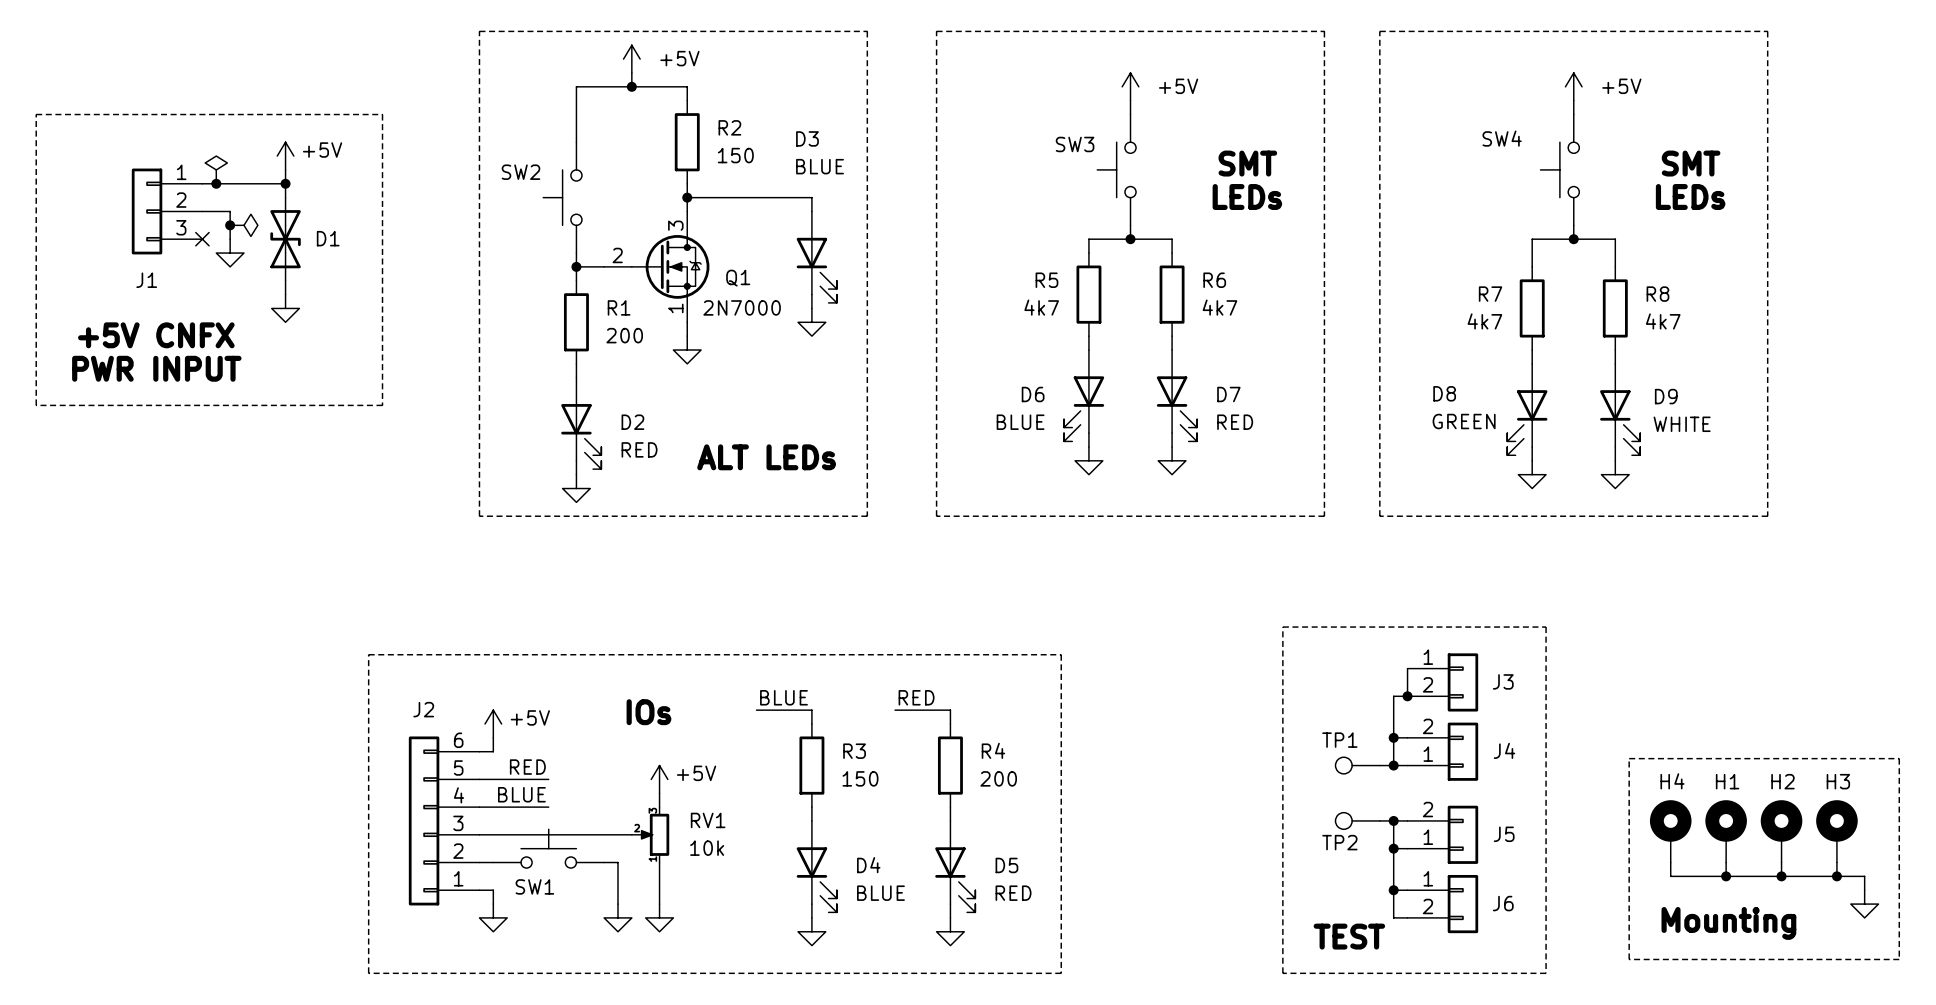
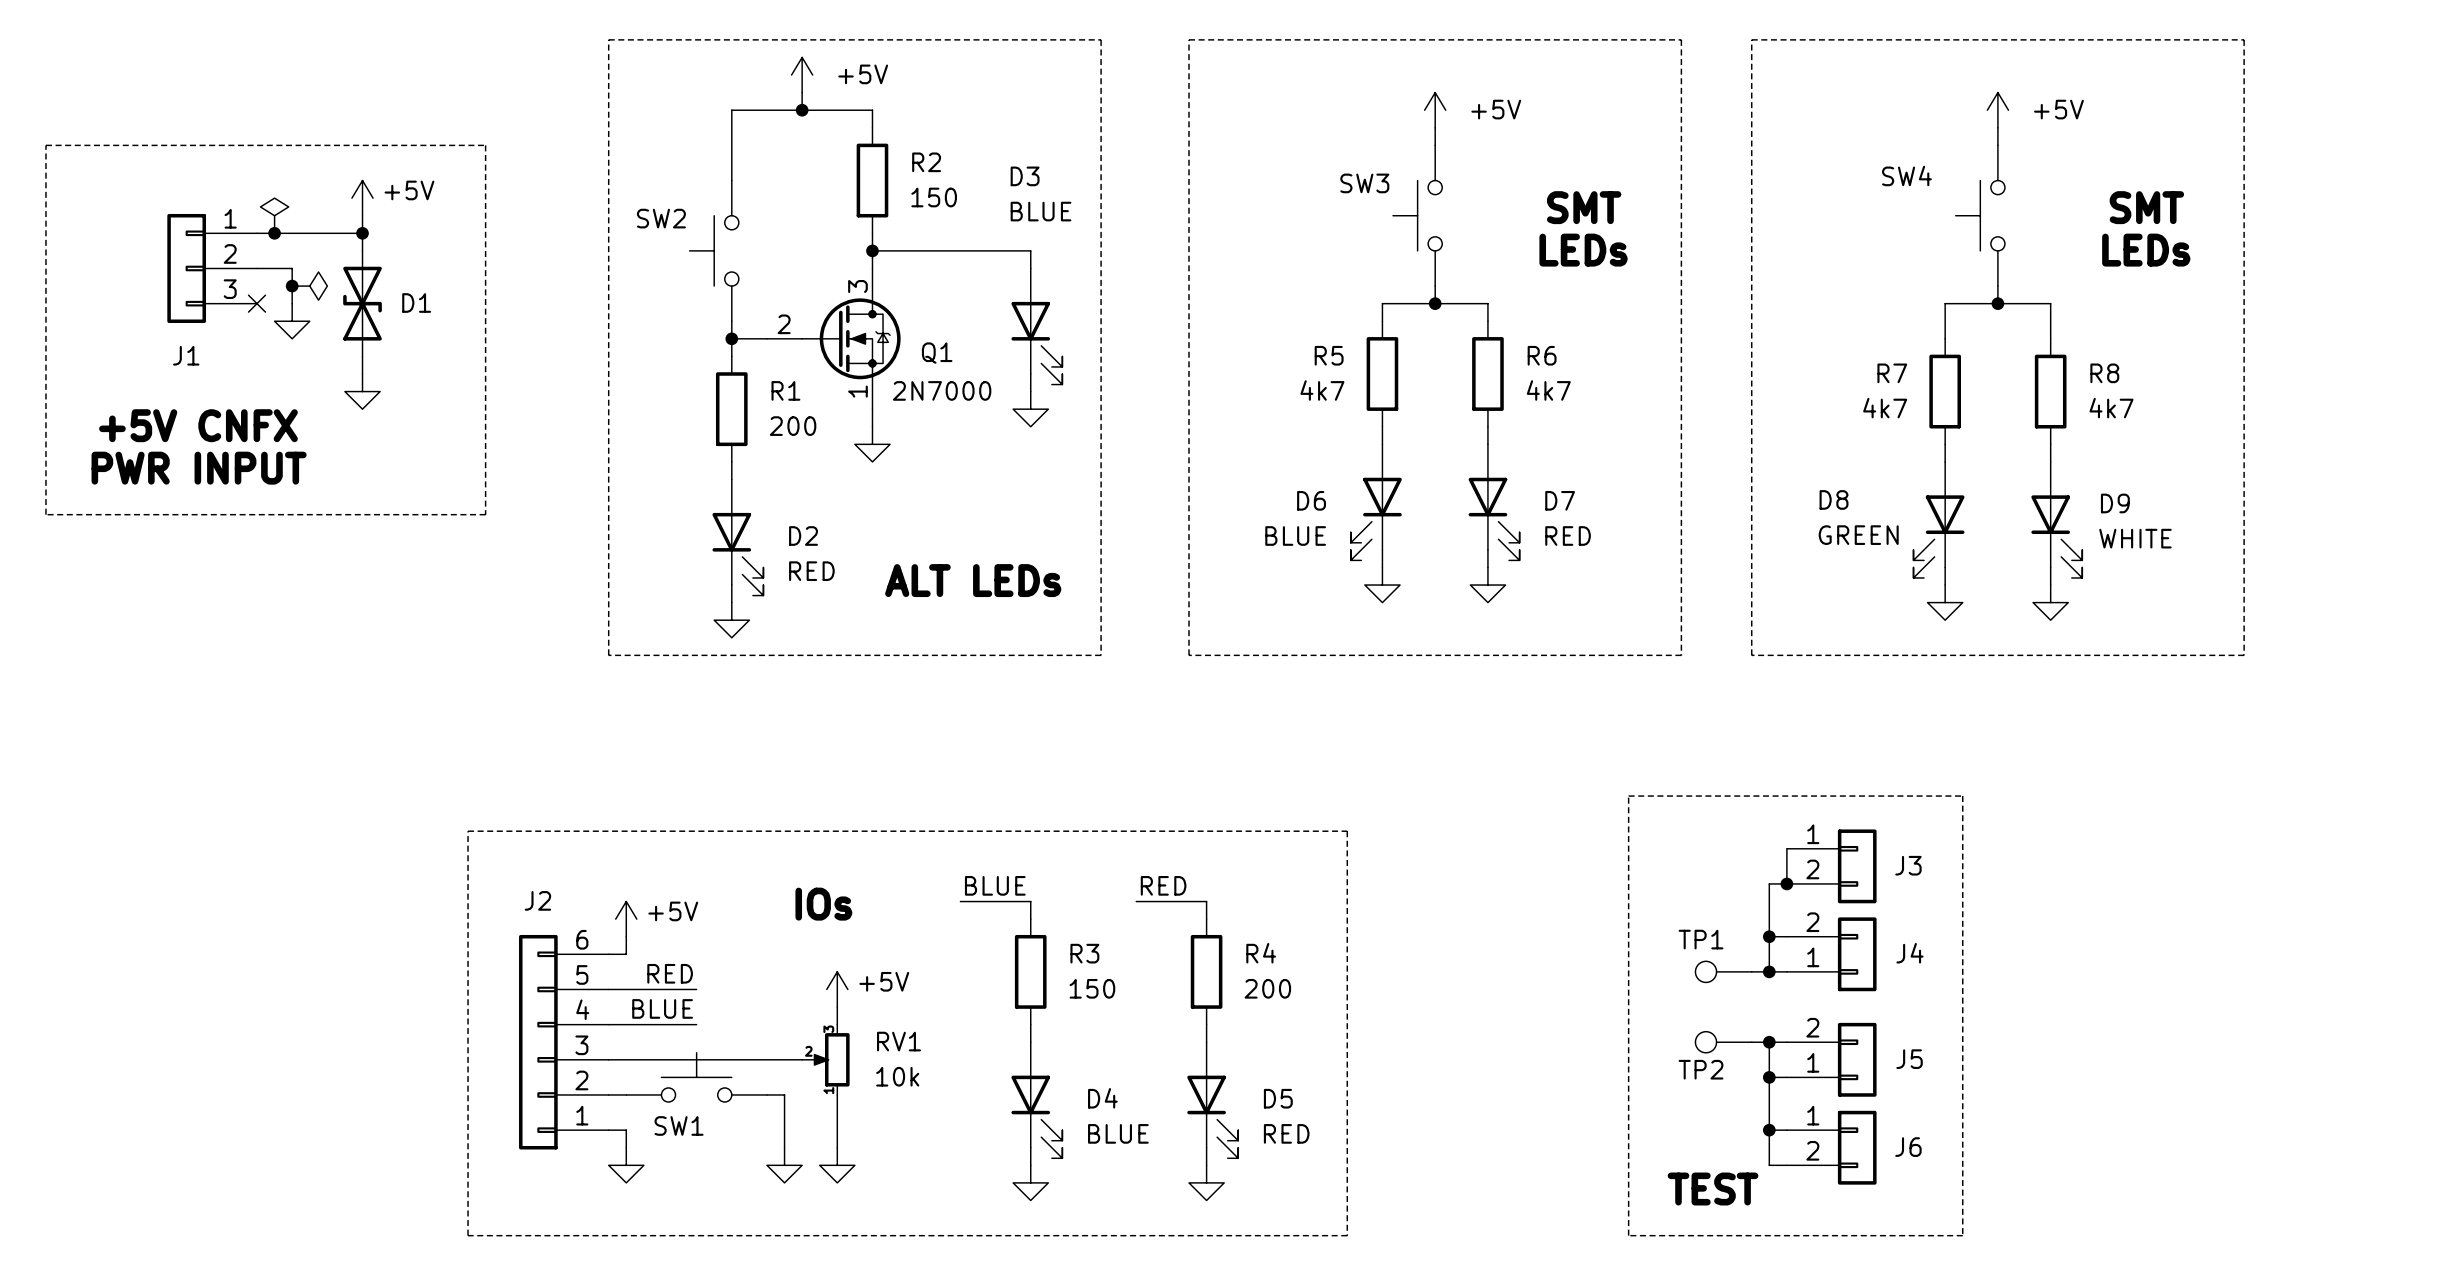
line: (1629, 758) (1899, 758) (1899, 959) (1629, 959) (1629, 758) -> none
H4: (1670, 831) -> none
H1: (1726, 831) -> none
H2: (1781, 831) -> none
H3: (1836, 831) -> none
wire: (1670, 862) (1670, 876) (1864, 876) (1864, 890) -> none
wire: (1726, 862) (1726, 876) -> none
wire: (1781, 862) (1781, 876) -> none
wire: (1836, 862) (1836, 876) -> none
junction: (1726, 876) -> none
junction: (1781, 876) -> none
junction: (1836, 876) -> none
power symbol: (1864, 904) -> none
text: Mounting (1728, 923) -> none

